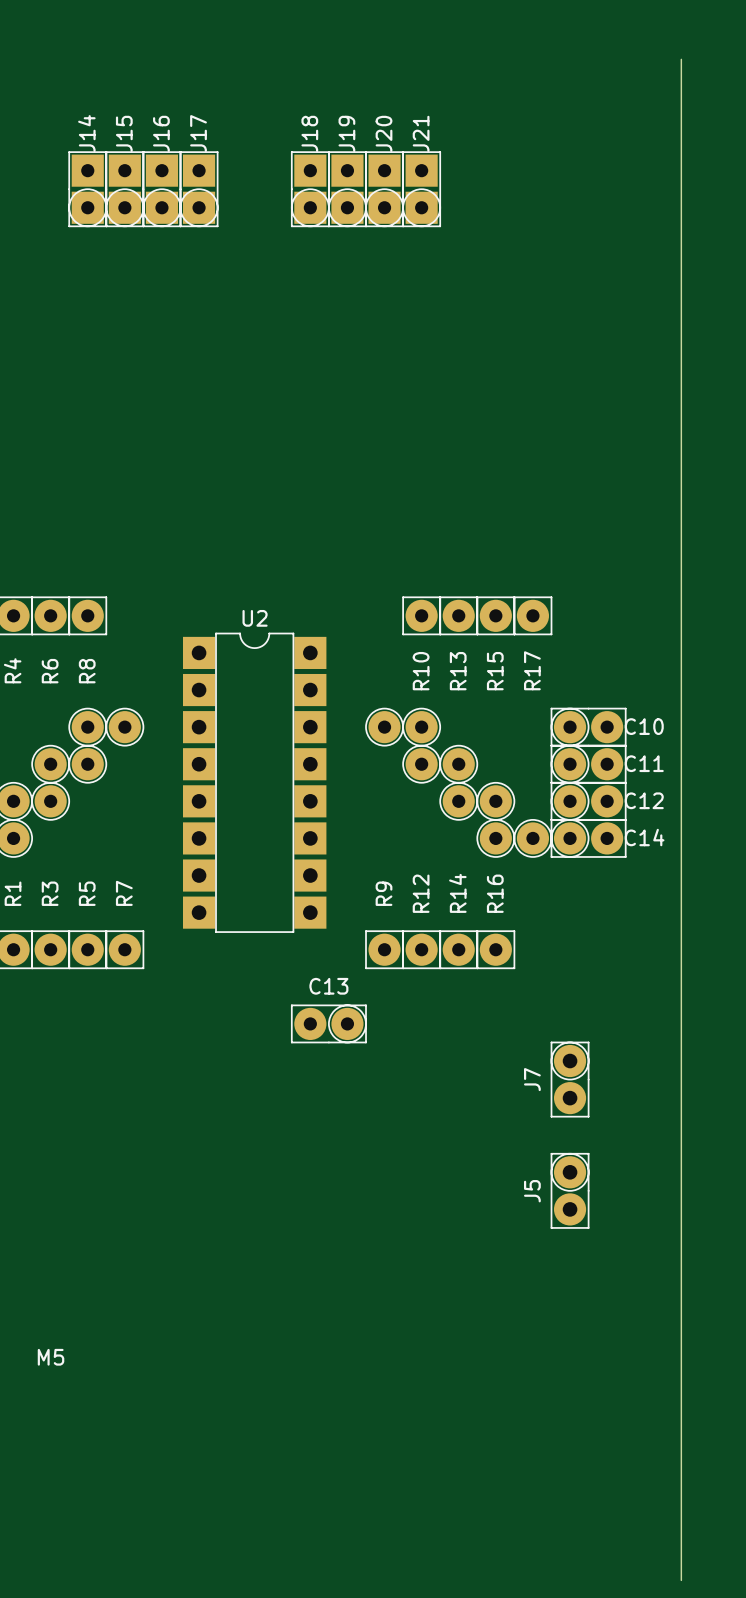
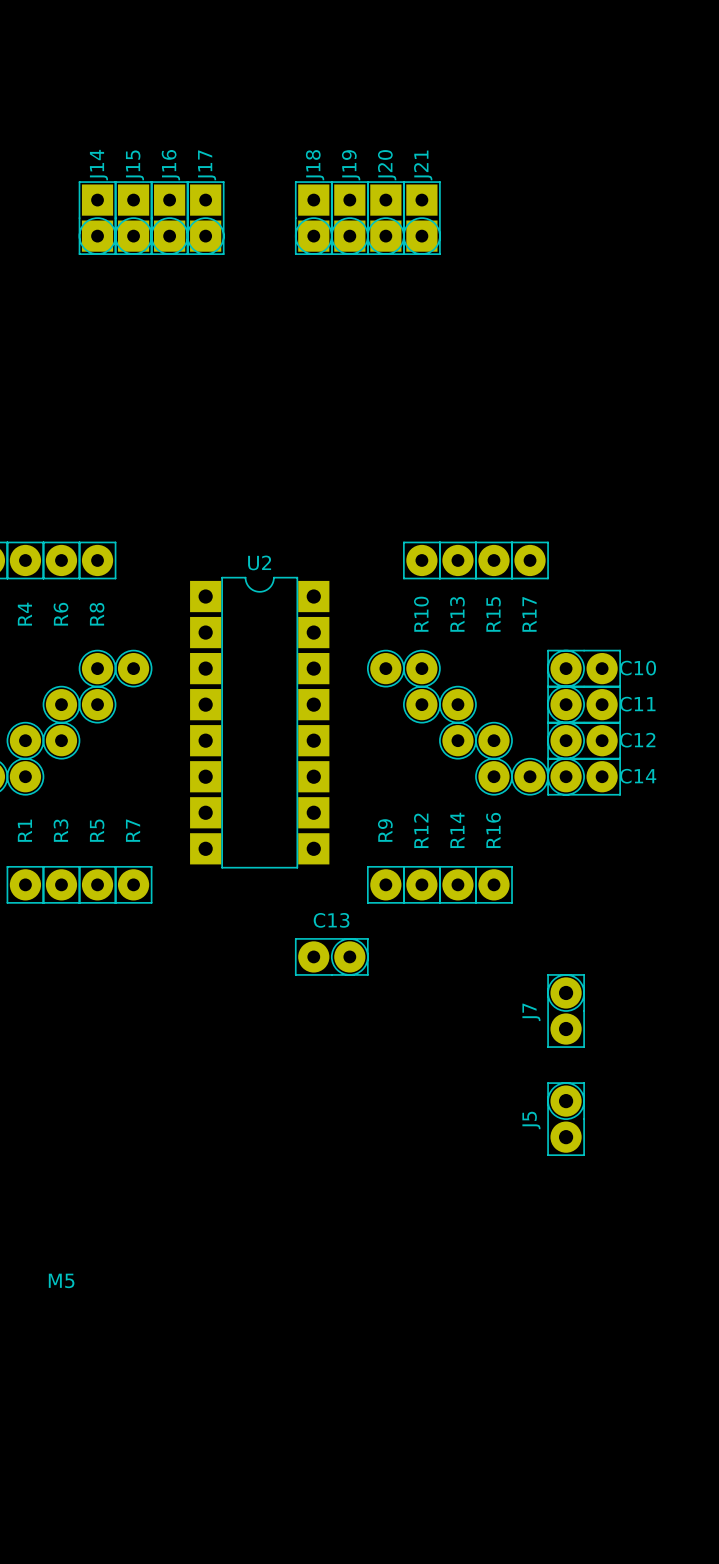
board edge: (681, 59) (681, 1580) -> none
J14 position: (87, 189) -> (97, 218)
J15 position: (124, 189) -> (133, 218)
J16 position: (161, 189) -> (169, 218)
J17 position: (199, 189) -> (205, 218)
J18 position: (310, 189) -> (313, 218)
J19 position: (347, 189) -> (349, 218)
J20 position: (384, 189) -> (385, 218)
J21 position: (421, 189) -> (421, 218)

